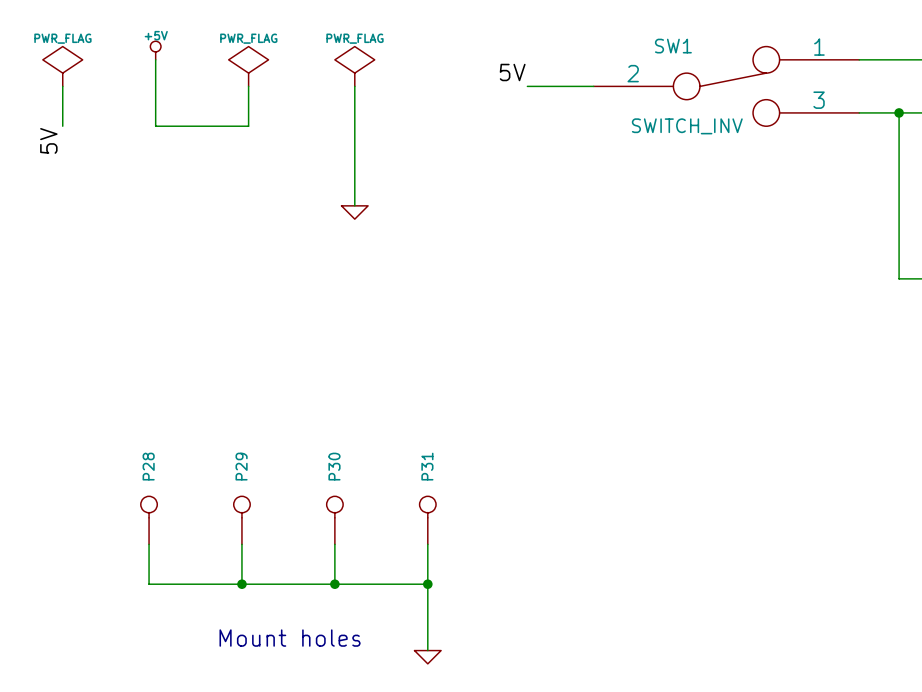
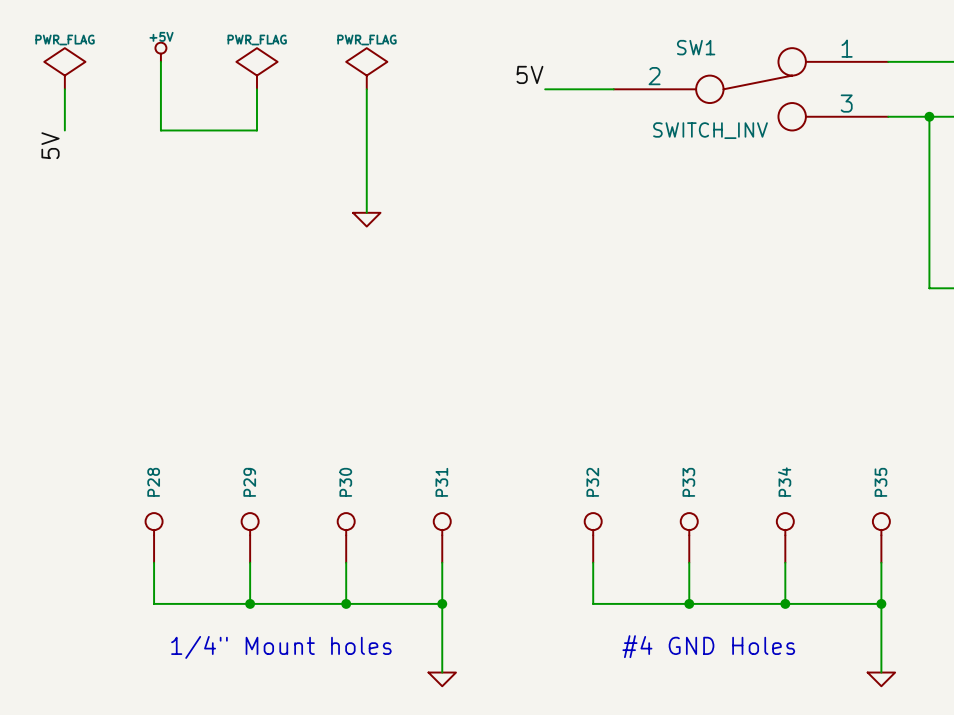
P32: none -> (593, 537)
P33: none -> (689, 537)
P34: none -> (785, 537)
P35: none -> (881, 537)
wire: none -> (593, 562) (593, 603) (881, 603)
wire: none -> (689, 562) (689, 603)
wire: none -> (785, 562) (785, 603)
wire: none -> (881, 562) (881, 672)
junction: none -> (689, 603)
junction: none -> (785, 603)
junction: none -> (881, 603)
text: none -> #4 GND Holes (708, 646)
text: Mount holes (290, 638) -> 1/4" Mount holes (281, 647)
power symbol: none -> (881, 679)

